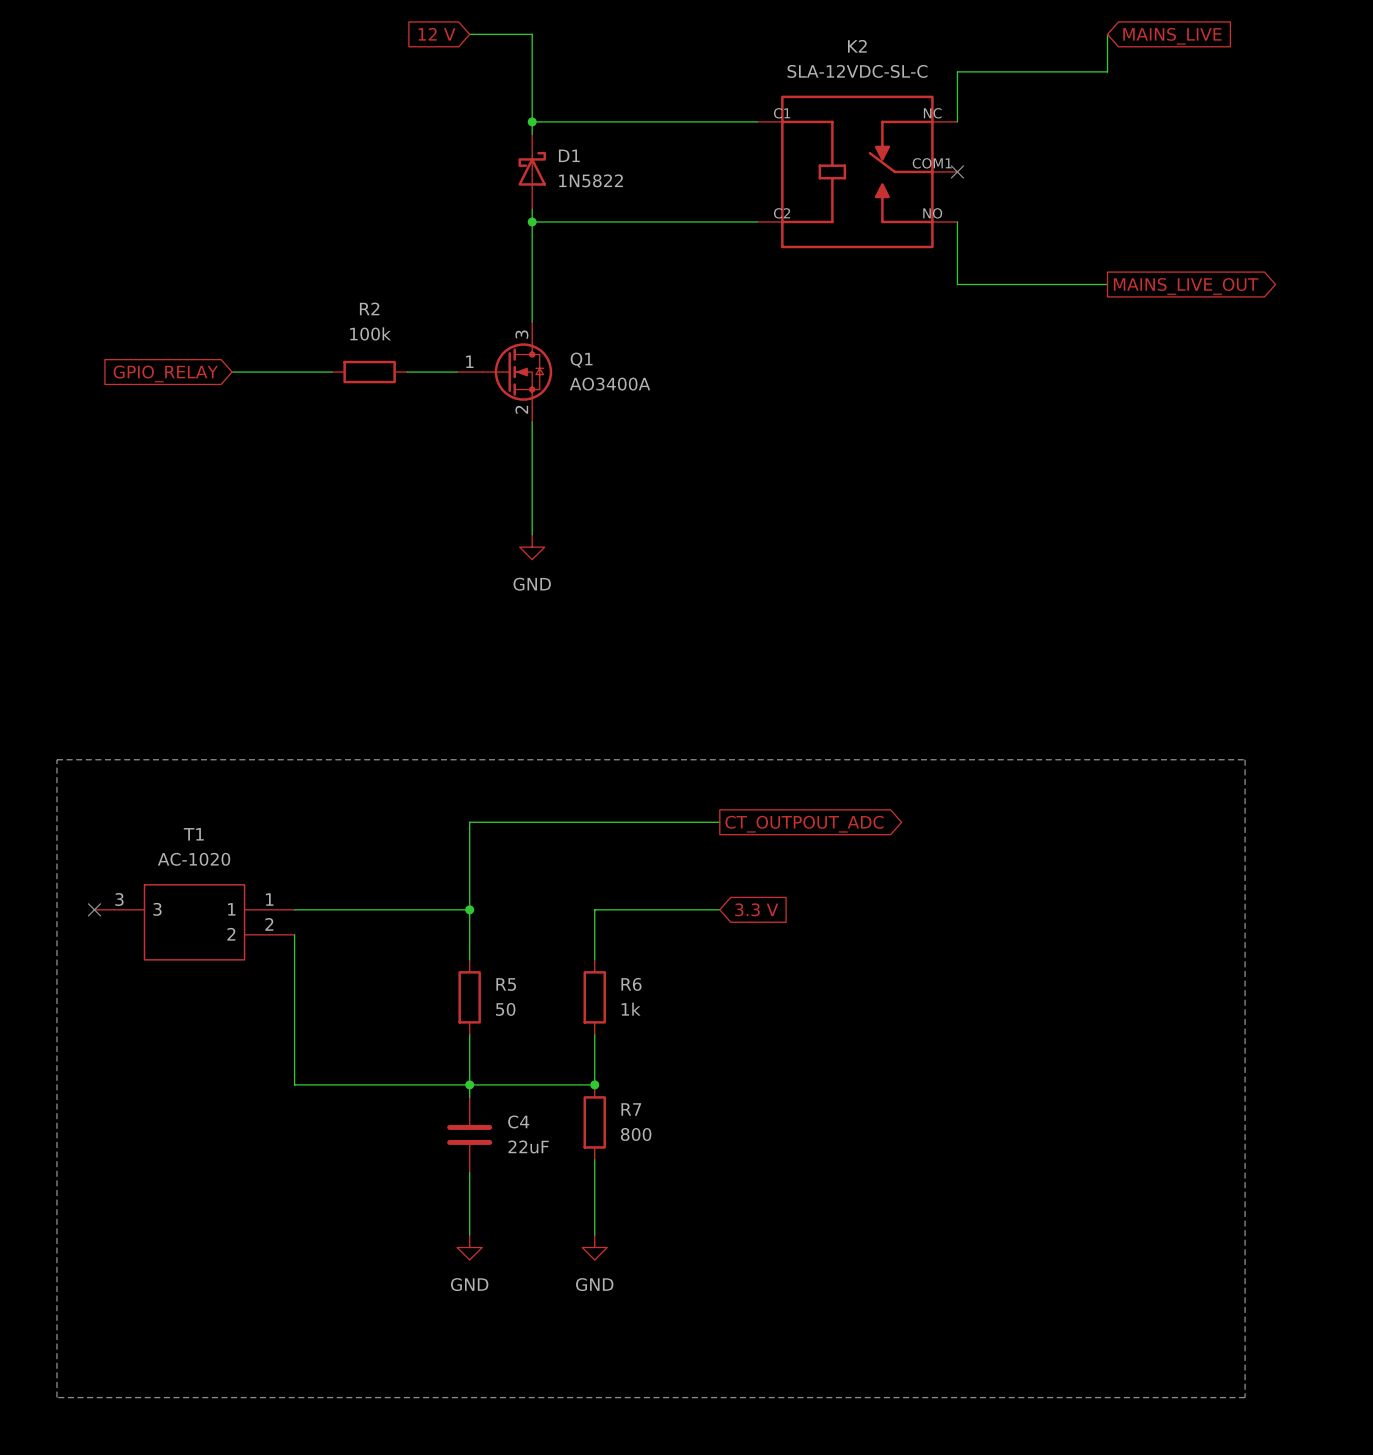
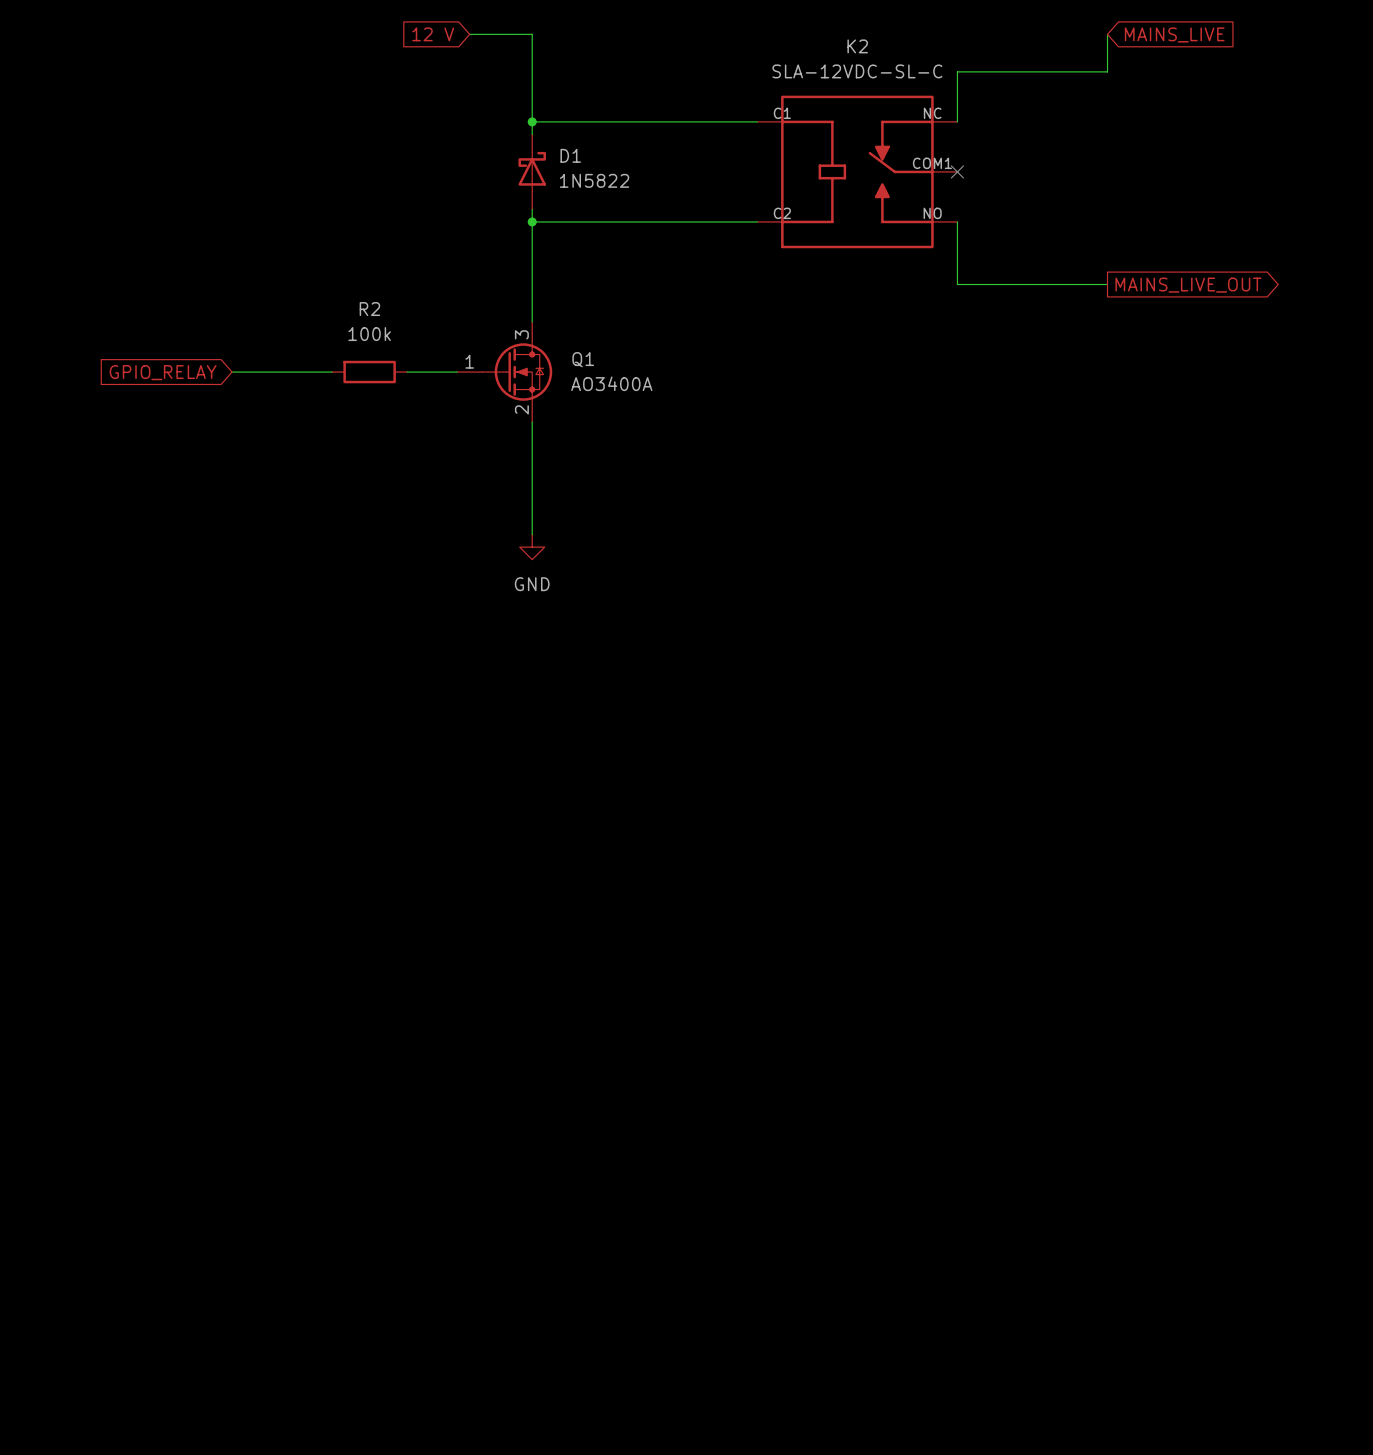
line: (56, 759) (1245, 759) (1245, 1397) (56, 1397) (56, 759) -> none
wire: (719, 822) (469, 822) (469, 959) -> none
global label: CT_OUTPOUT_ADC (804, 824) -> none
no-connect mark: (94, 909) -> none
wire: (294, 909) (469, 909) -> none
junction: (469, 909) -> none
wire: (719, 909) (594, 909) (594, 959) -> none
global label: 3.3 V (756, 909) -> none
T1: AC-1020 (194, 922) -> none
wire: (294, 934) (294, 1084) (594, 1084) (594, 1034) -> none
R5: 50 (469, 997) -> none
R6: 1k (594, 997) -> none
wire: (469, 1034) (469, 1097) -> none
junction: (469, 1084) -> none
junction: (594, 1084) -> none
R7: 800 (594, 1122) -> none
C4: 22uF (469, 1134) -> none
wire: (594, 1159) (594, 1234) -> none
wire: (469, 1172) (469, 1234) -> none
power symbol: GND (469, 1247) -> none
power symbol: GND (594, 1247) -> none

